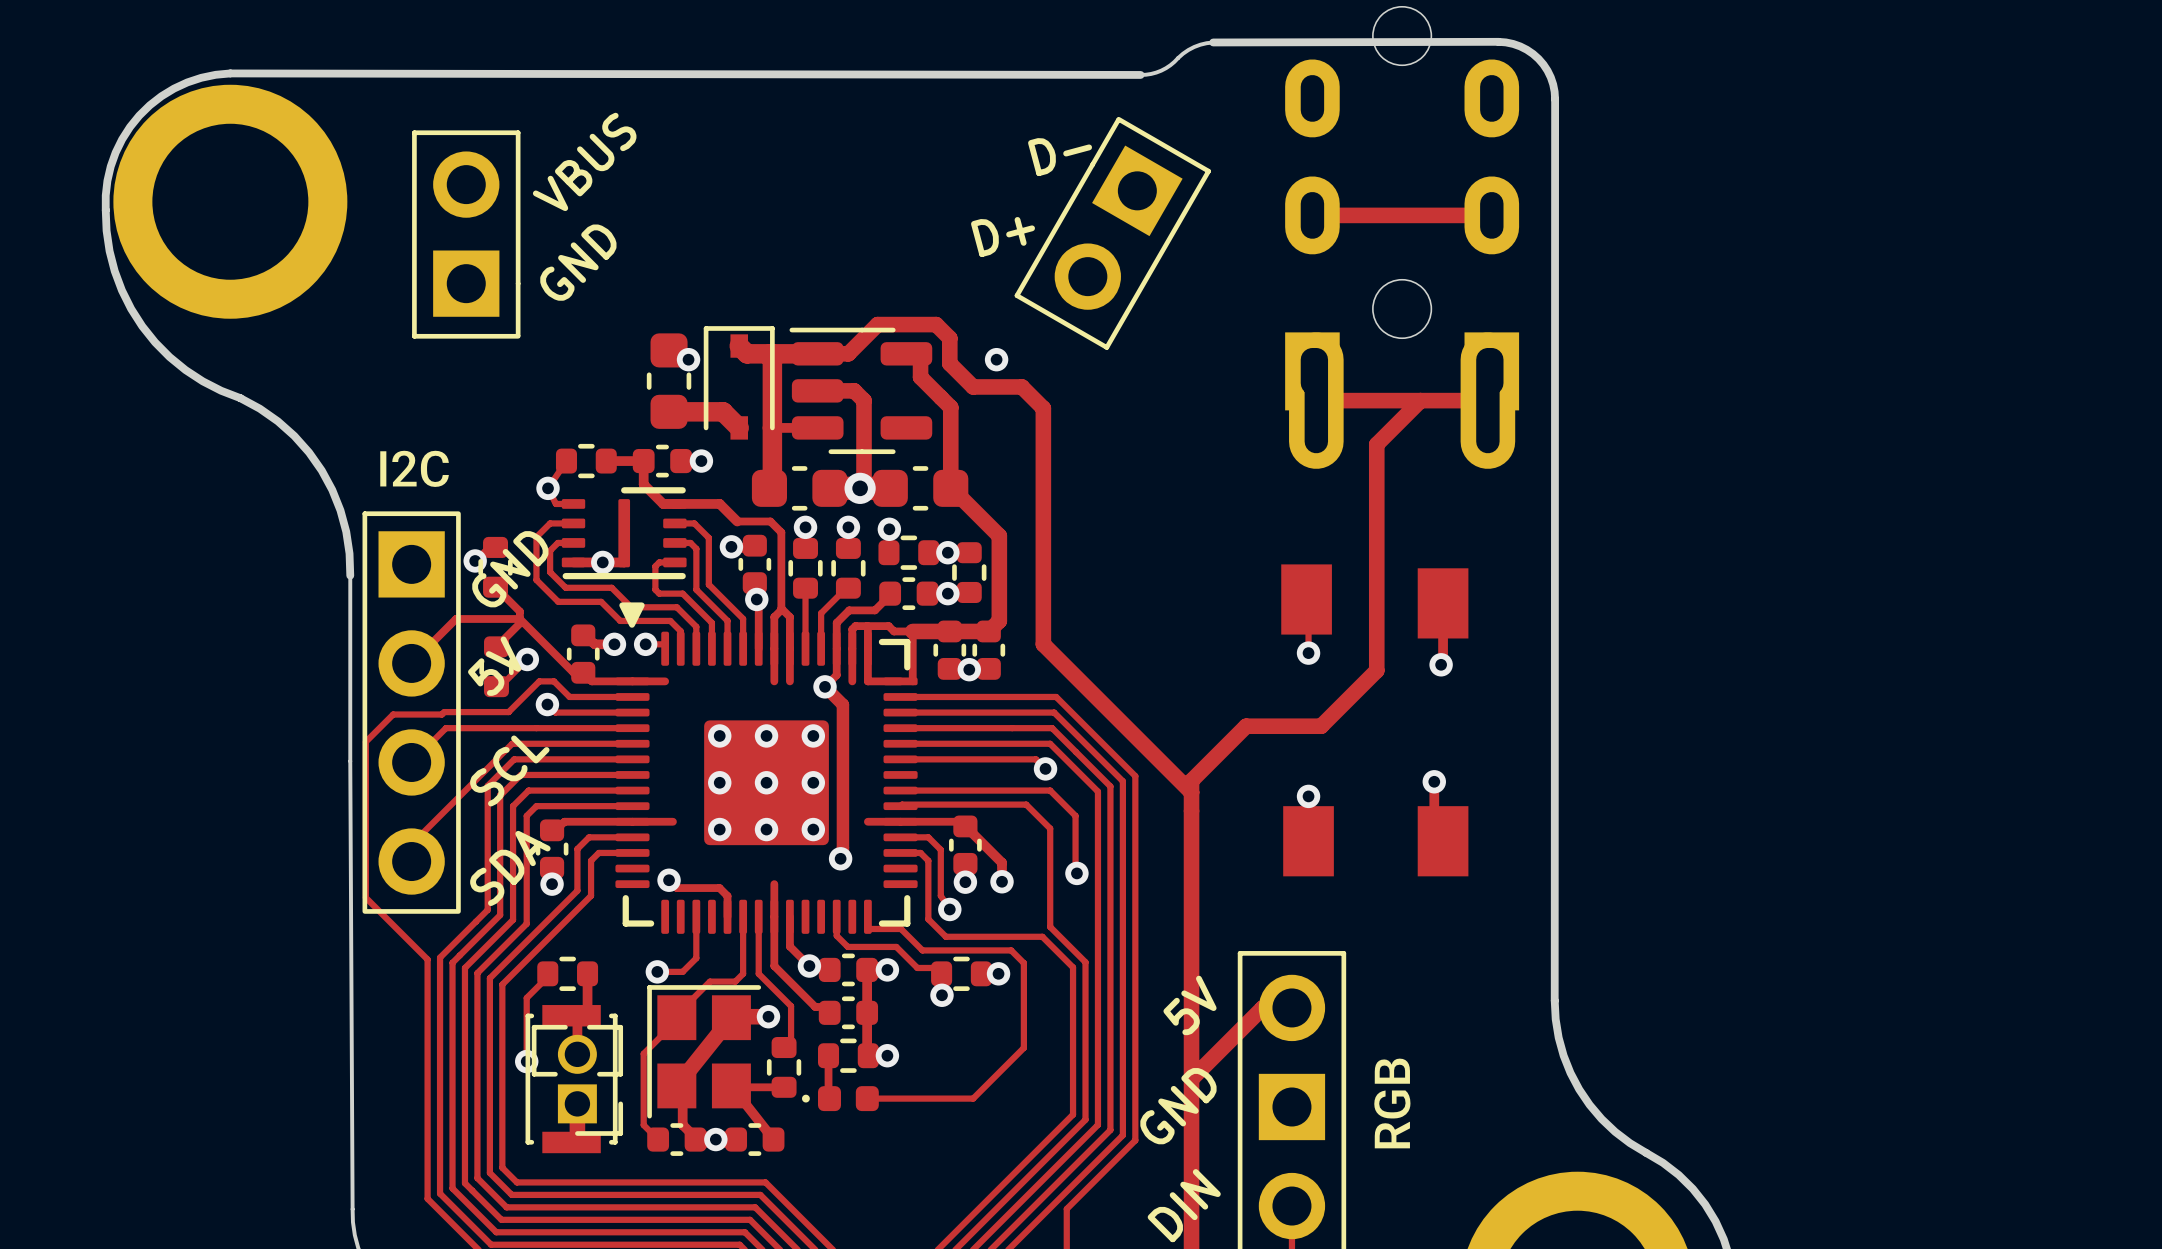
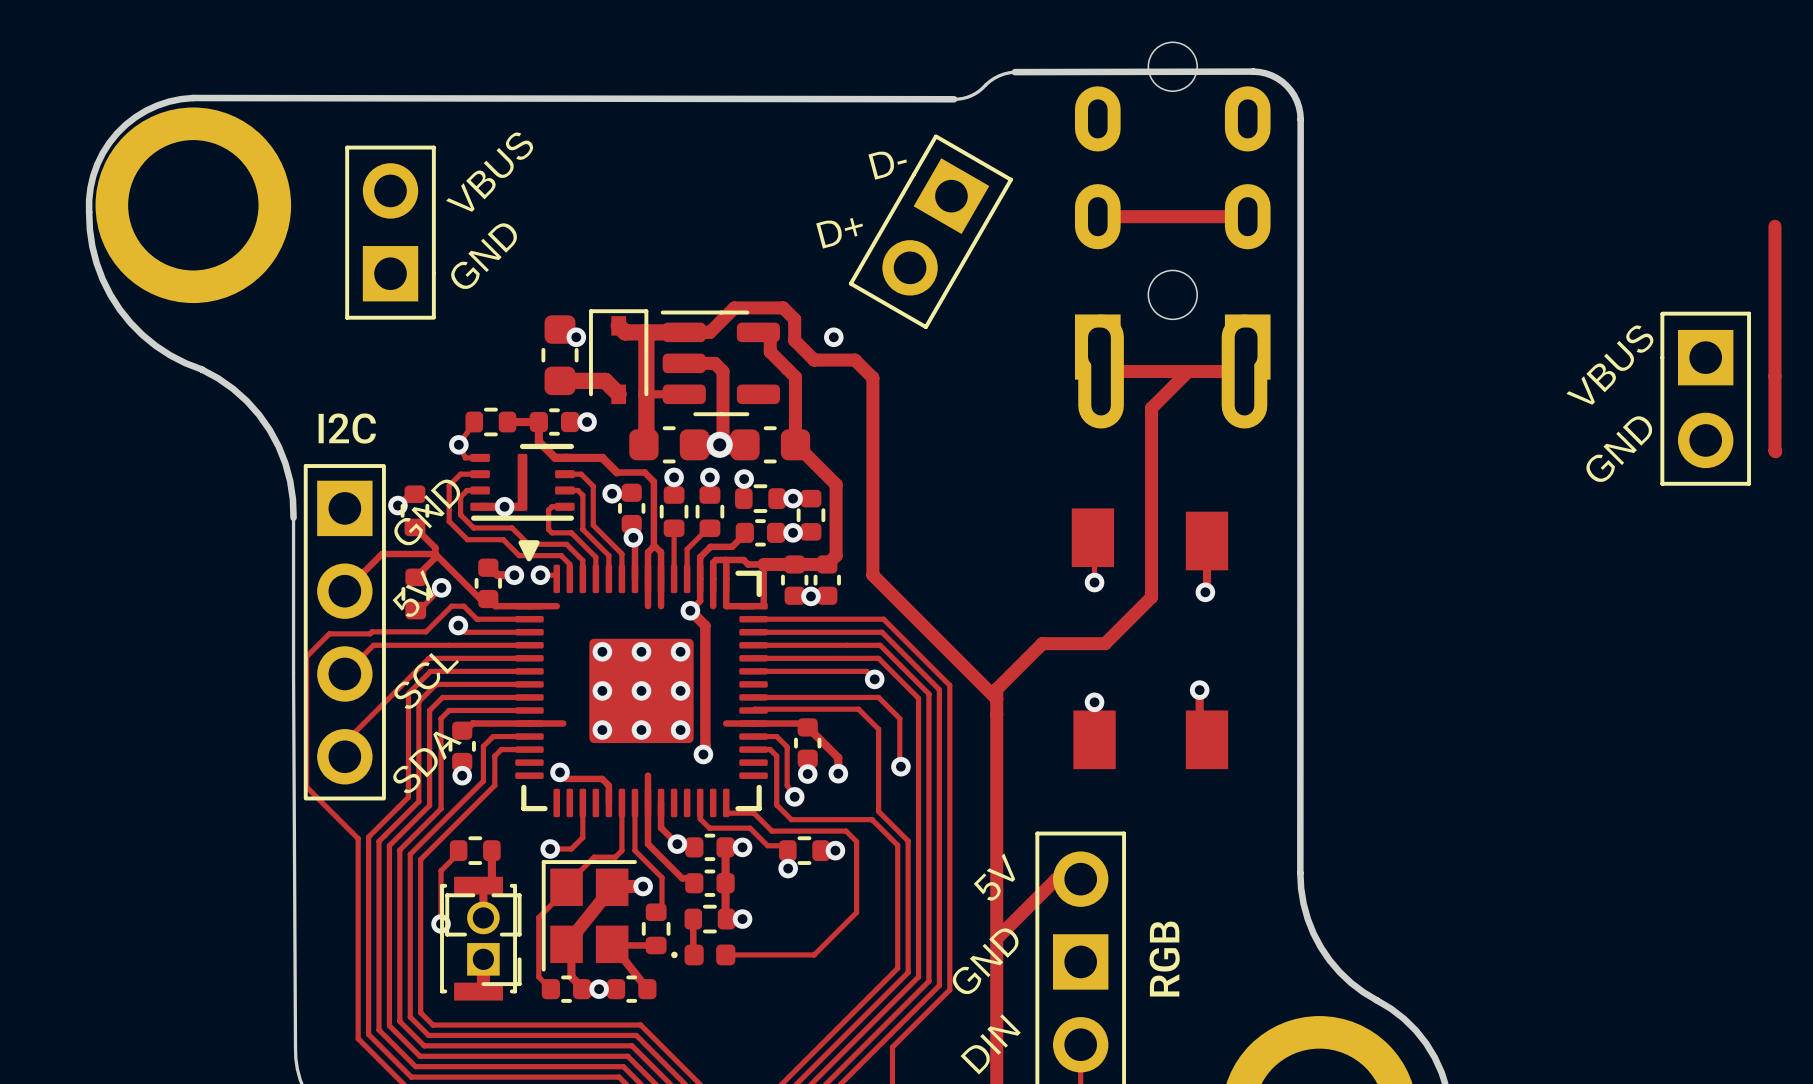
track: none -> (1774, 226) (1775, 451)
text: none -> VBUS (1610, 364)
part: none -> (1705, 398)
text: none -> GND (1619, 449)

